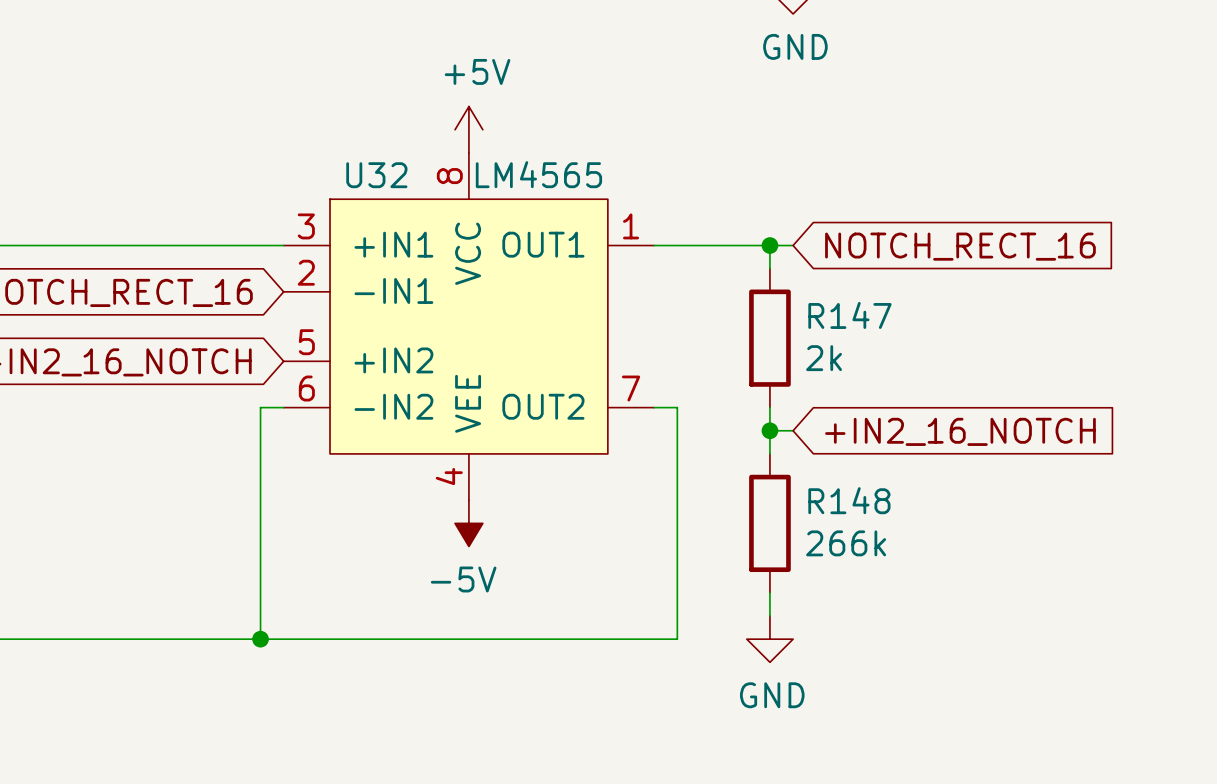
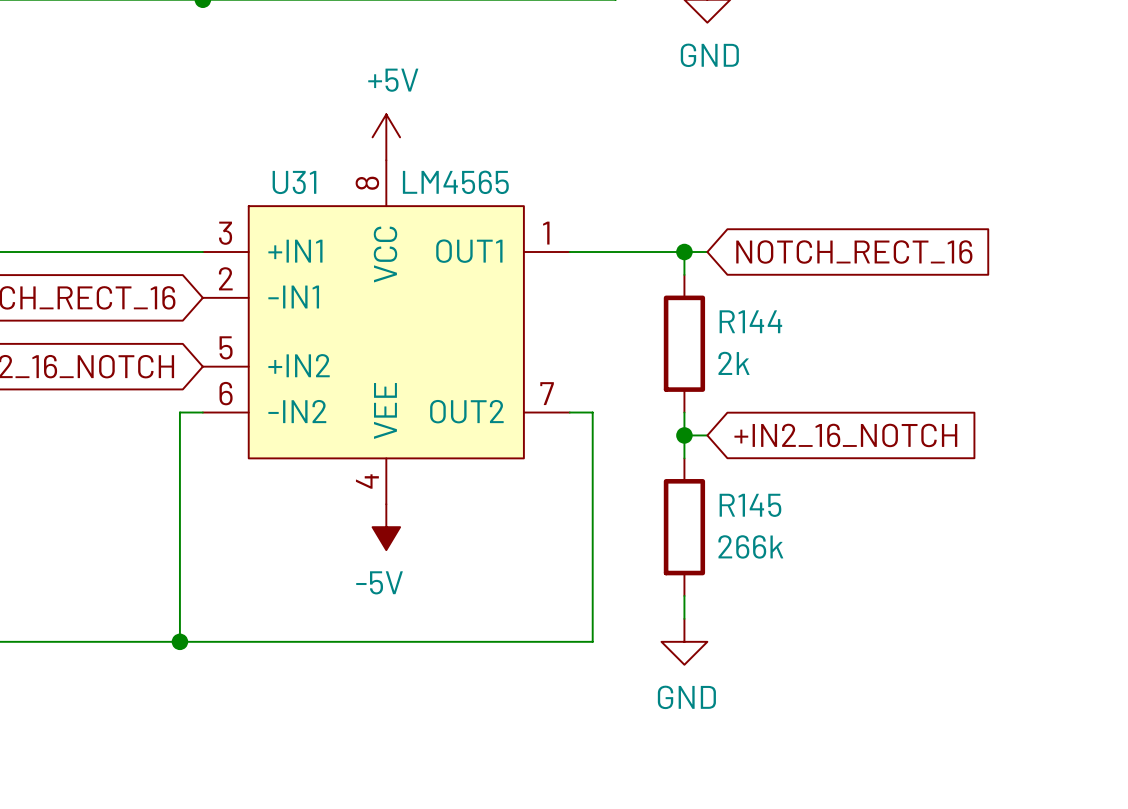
U32 name: U32 (376, 175) -> U31 (294, 182)
R147 name: R147 (849, 315) -> R144 (750, 321)
R148 name: R148 (849, 500) -> R145 (750, 505)

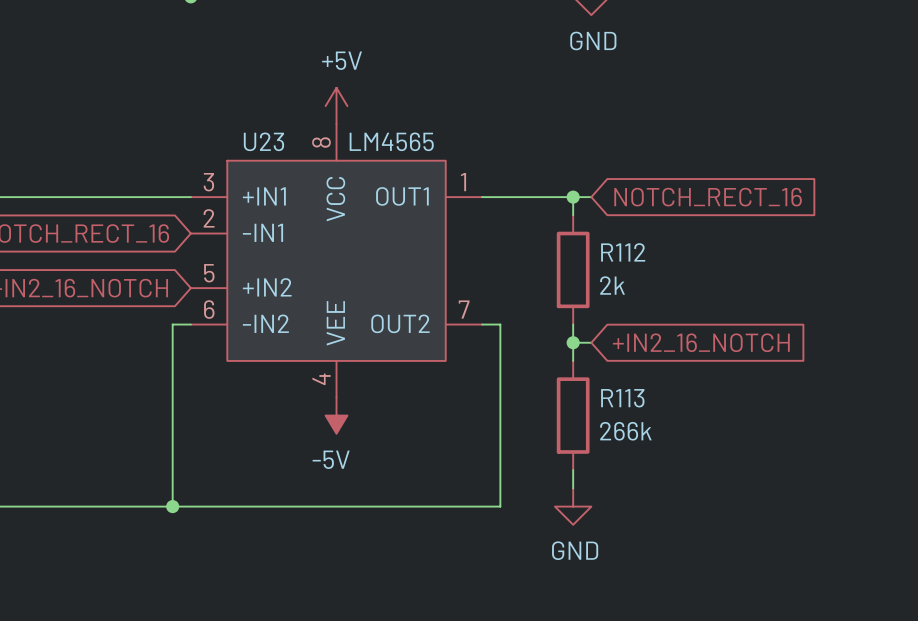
U31 name: U31 (294, 182) -> U23 (263, 141)
R144 name: R144 (750, 321) -> R112 (623, 252)
R145 name: R145 (750, 505) -> R113 (622, 398)

